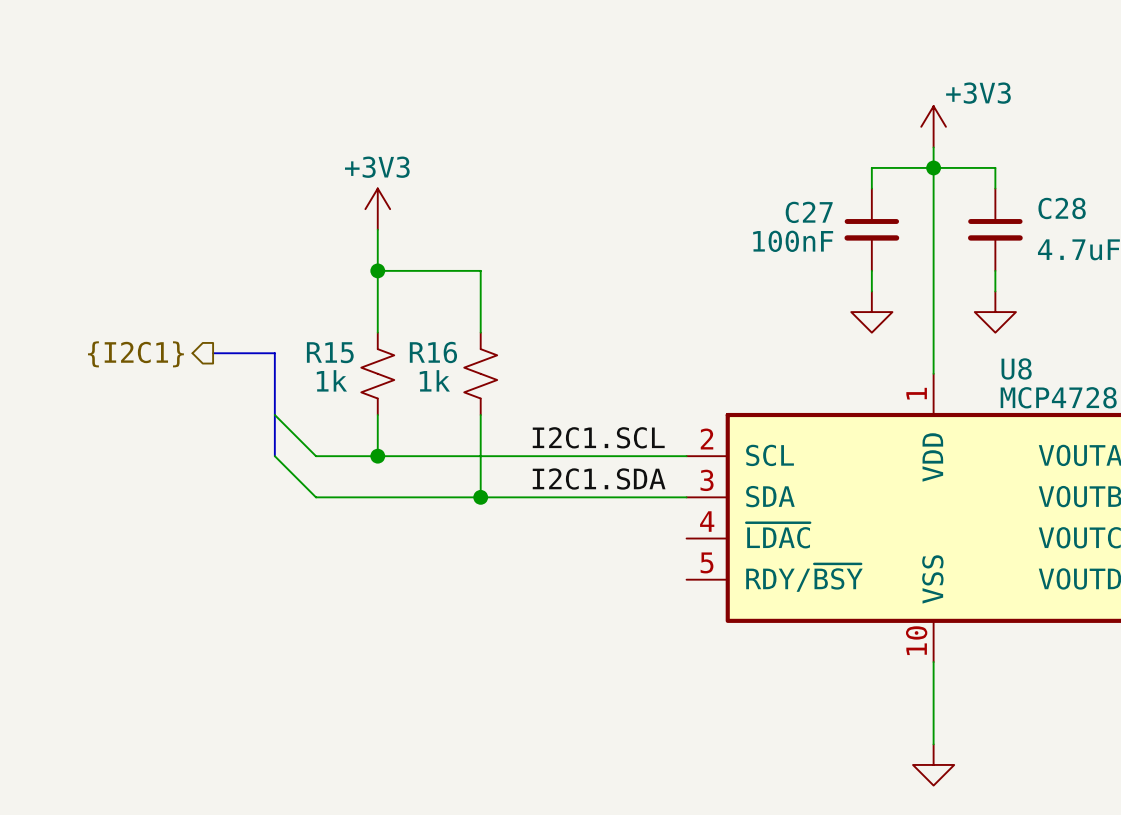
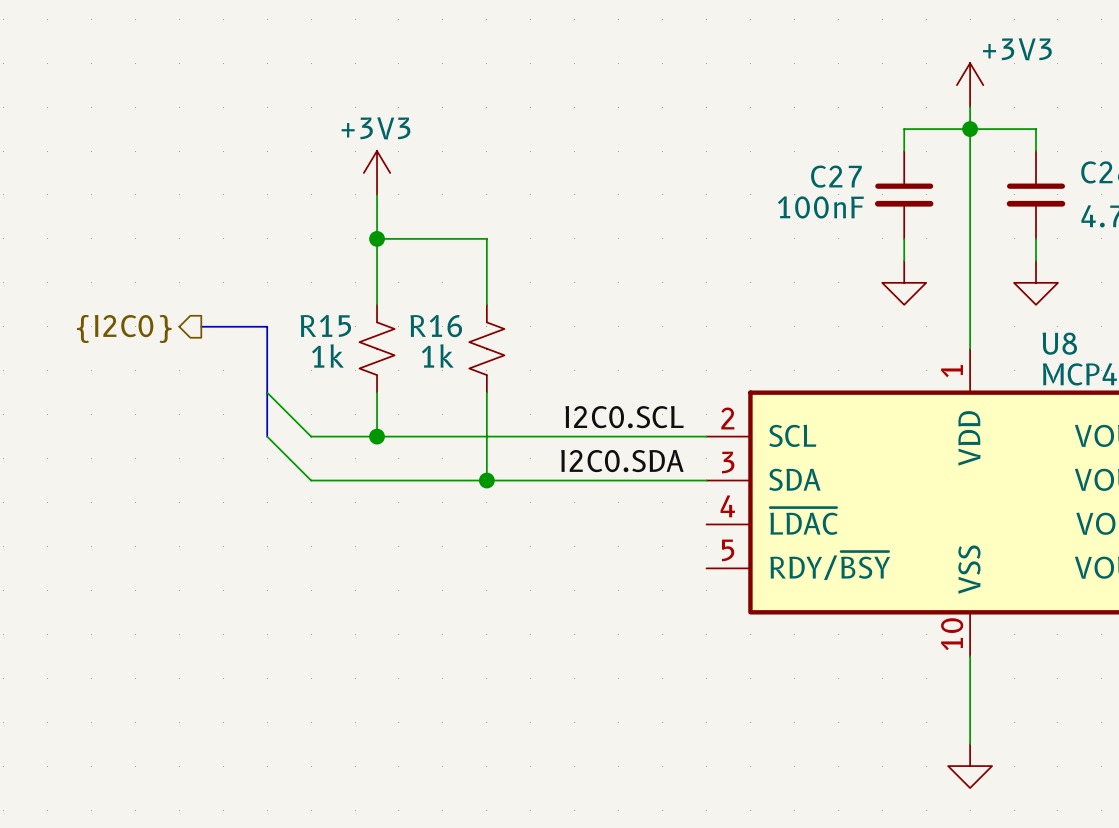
hierarchical label: {I2C1} (135, 354) -> {I2C0} (124, 328)
label: I2C1.SCL (598, 437) -> I2C0.SCL (624, 417)
label: I2C1.SDA (599, 478) -> I2C0.SDA (622, 461)

